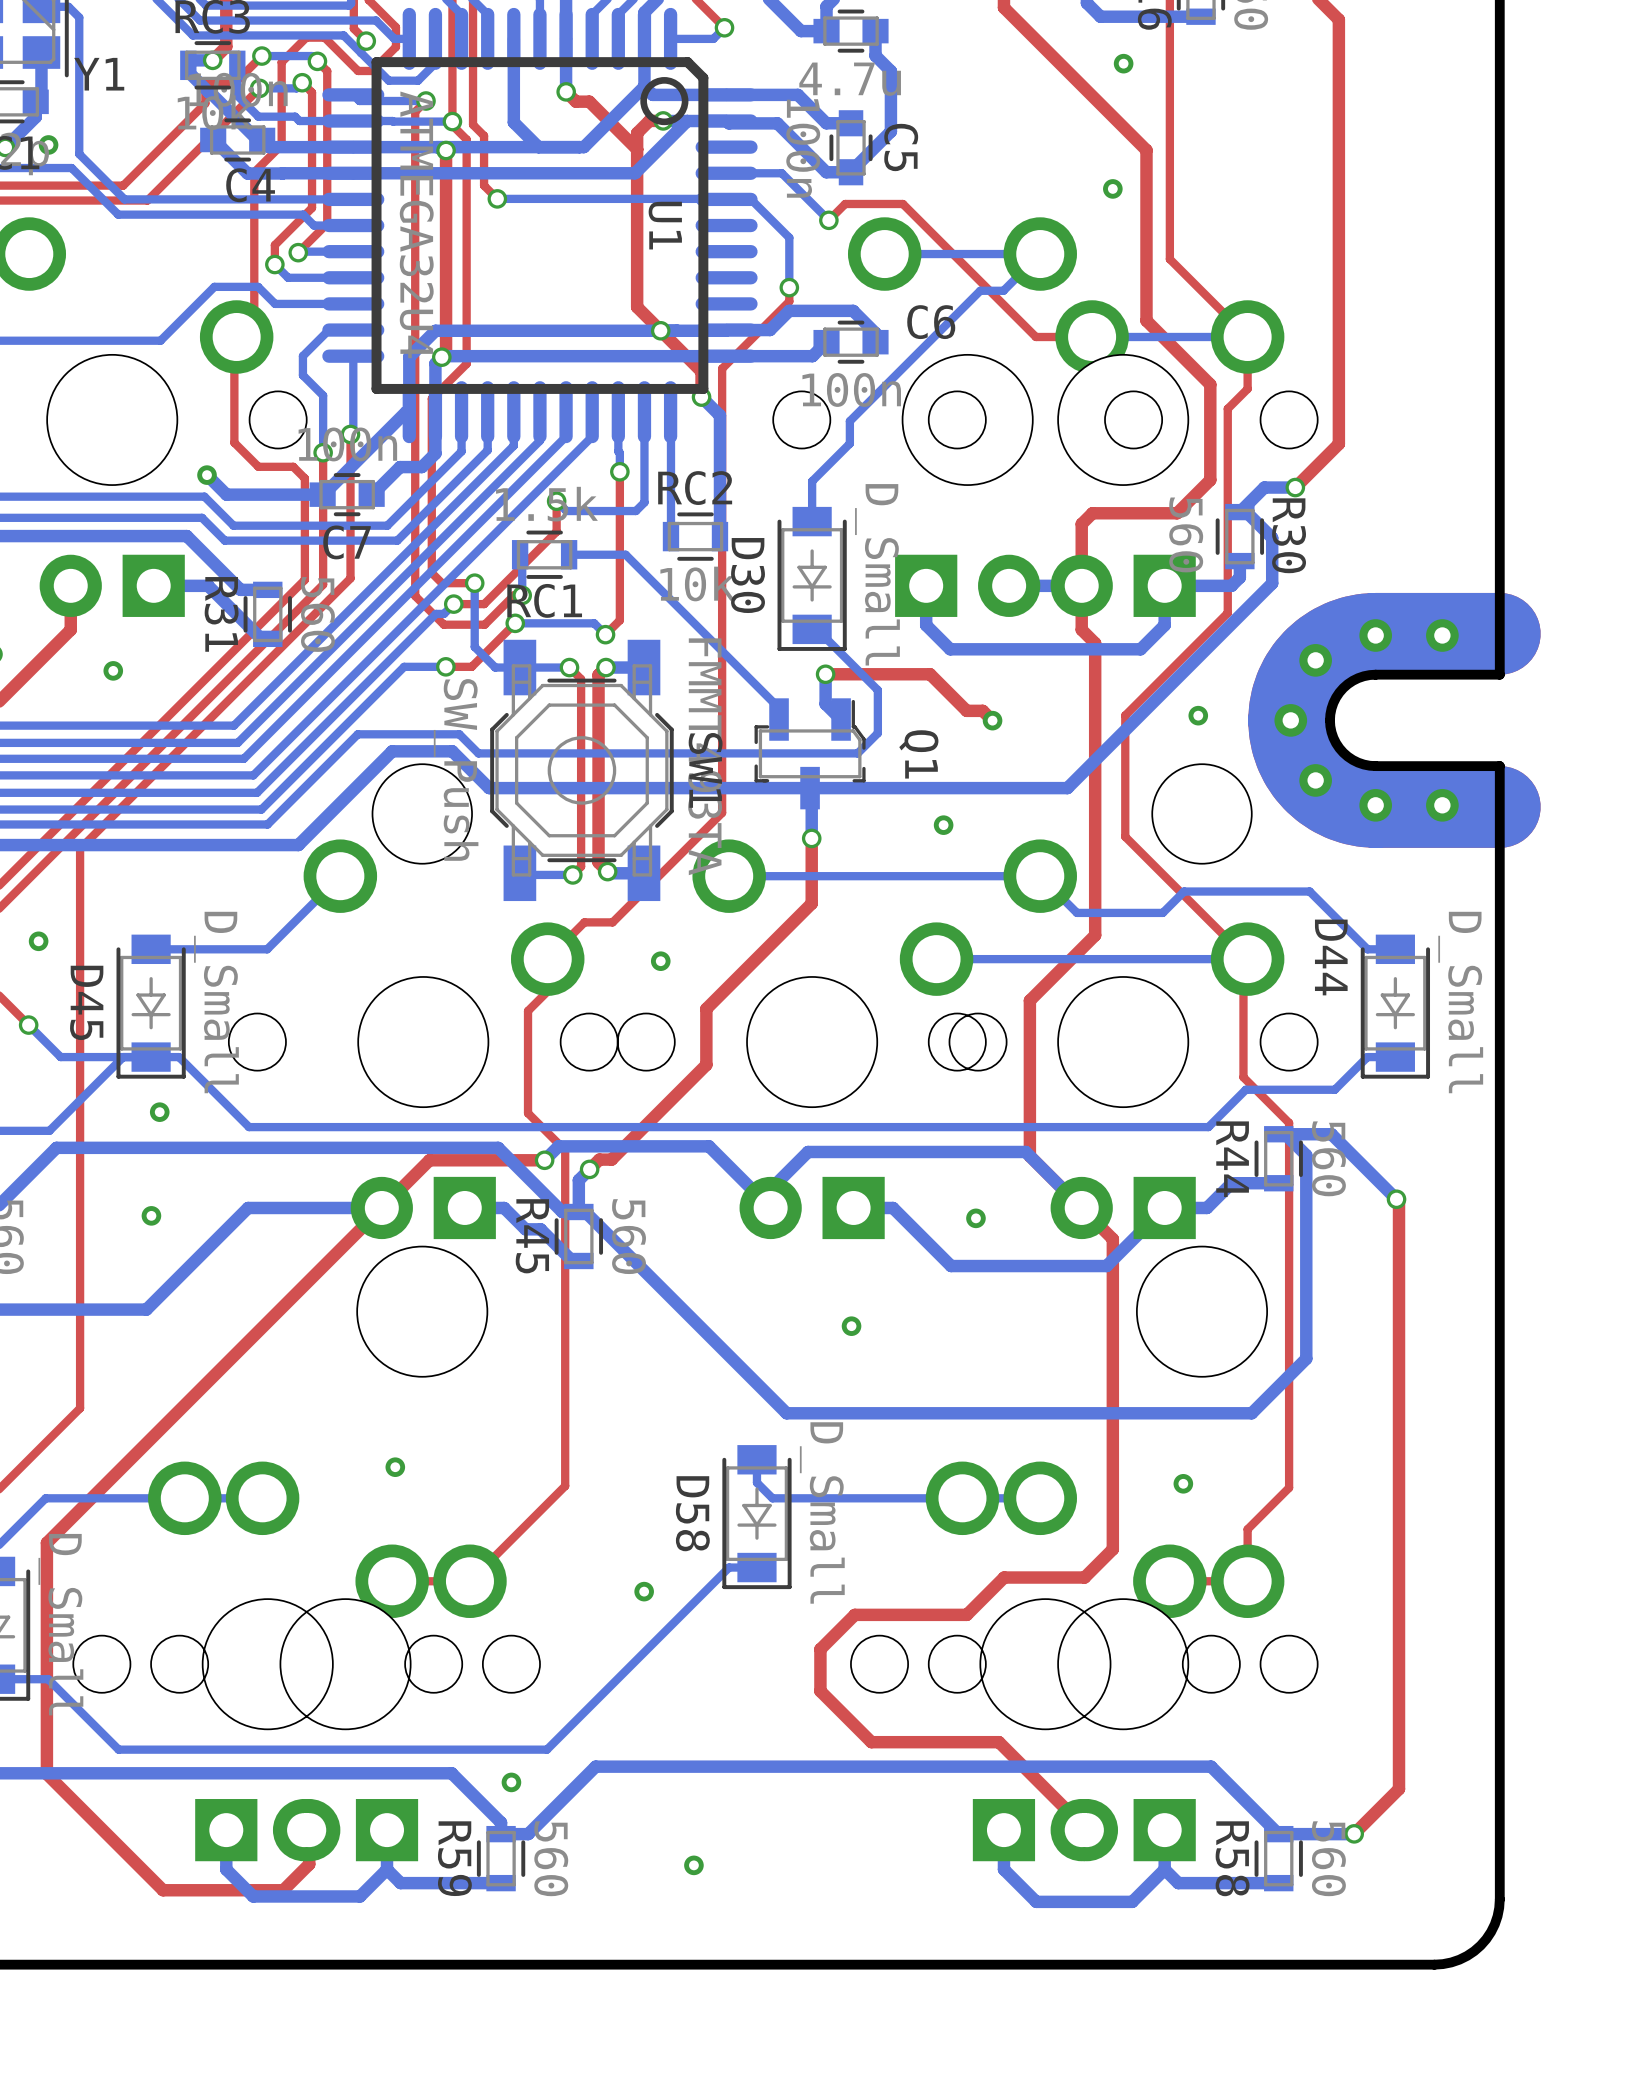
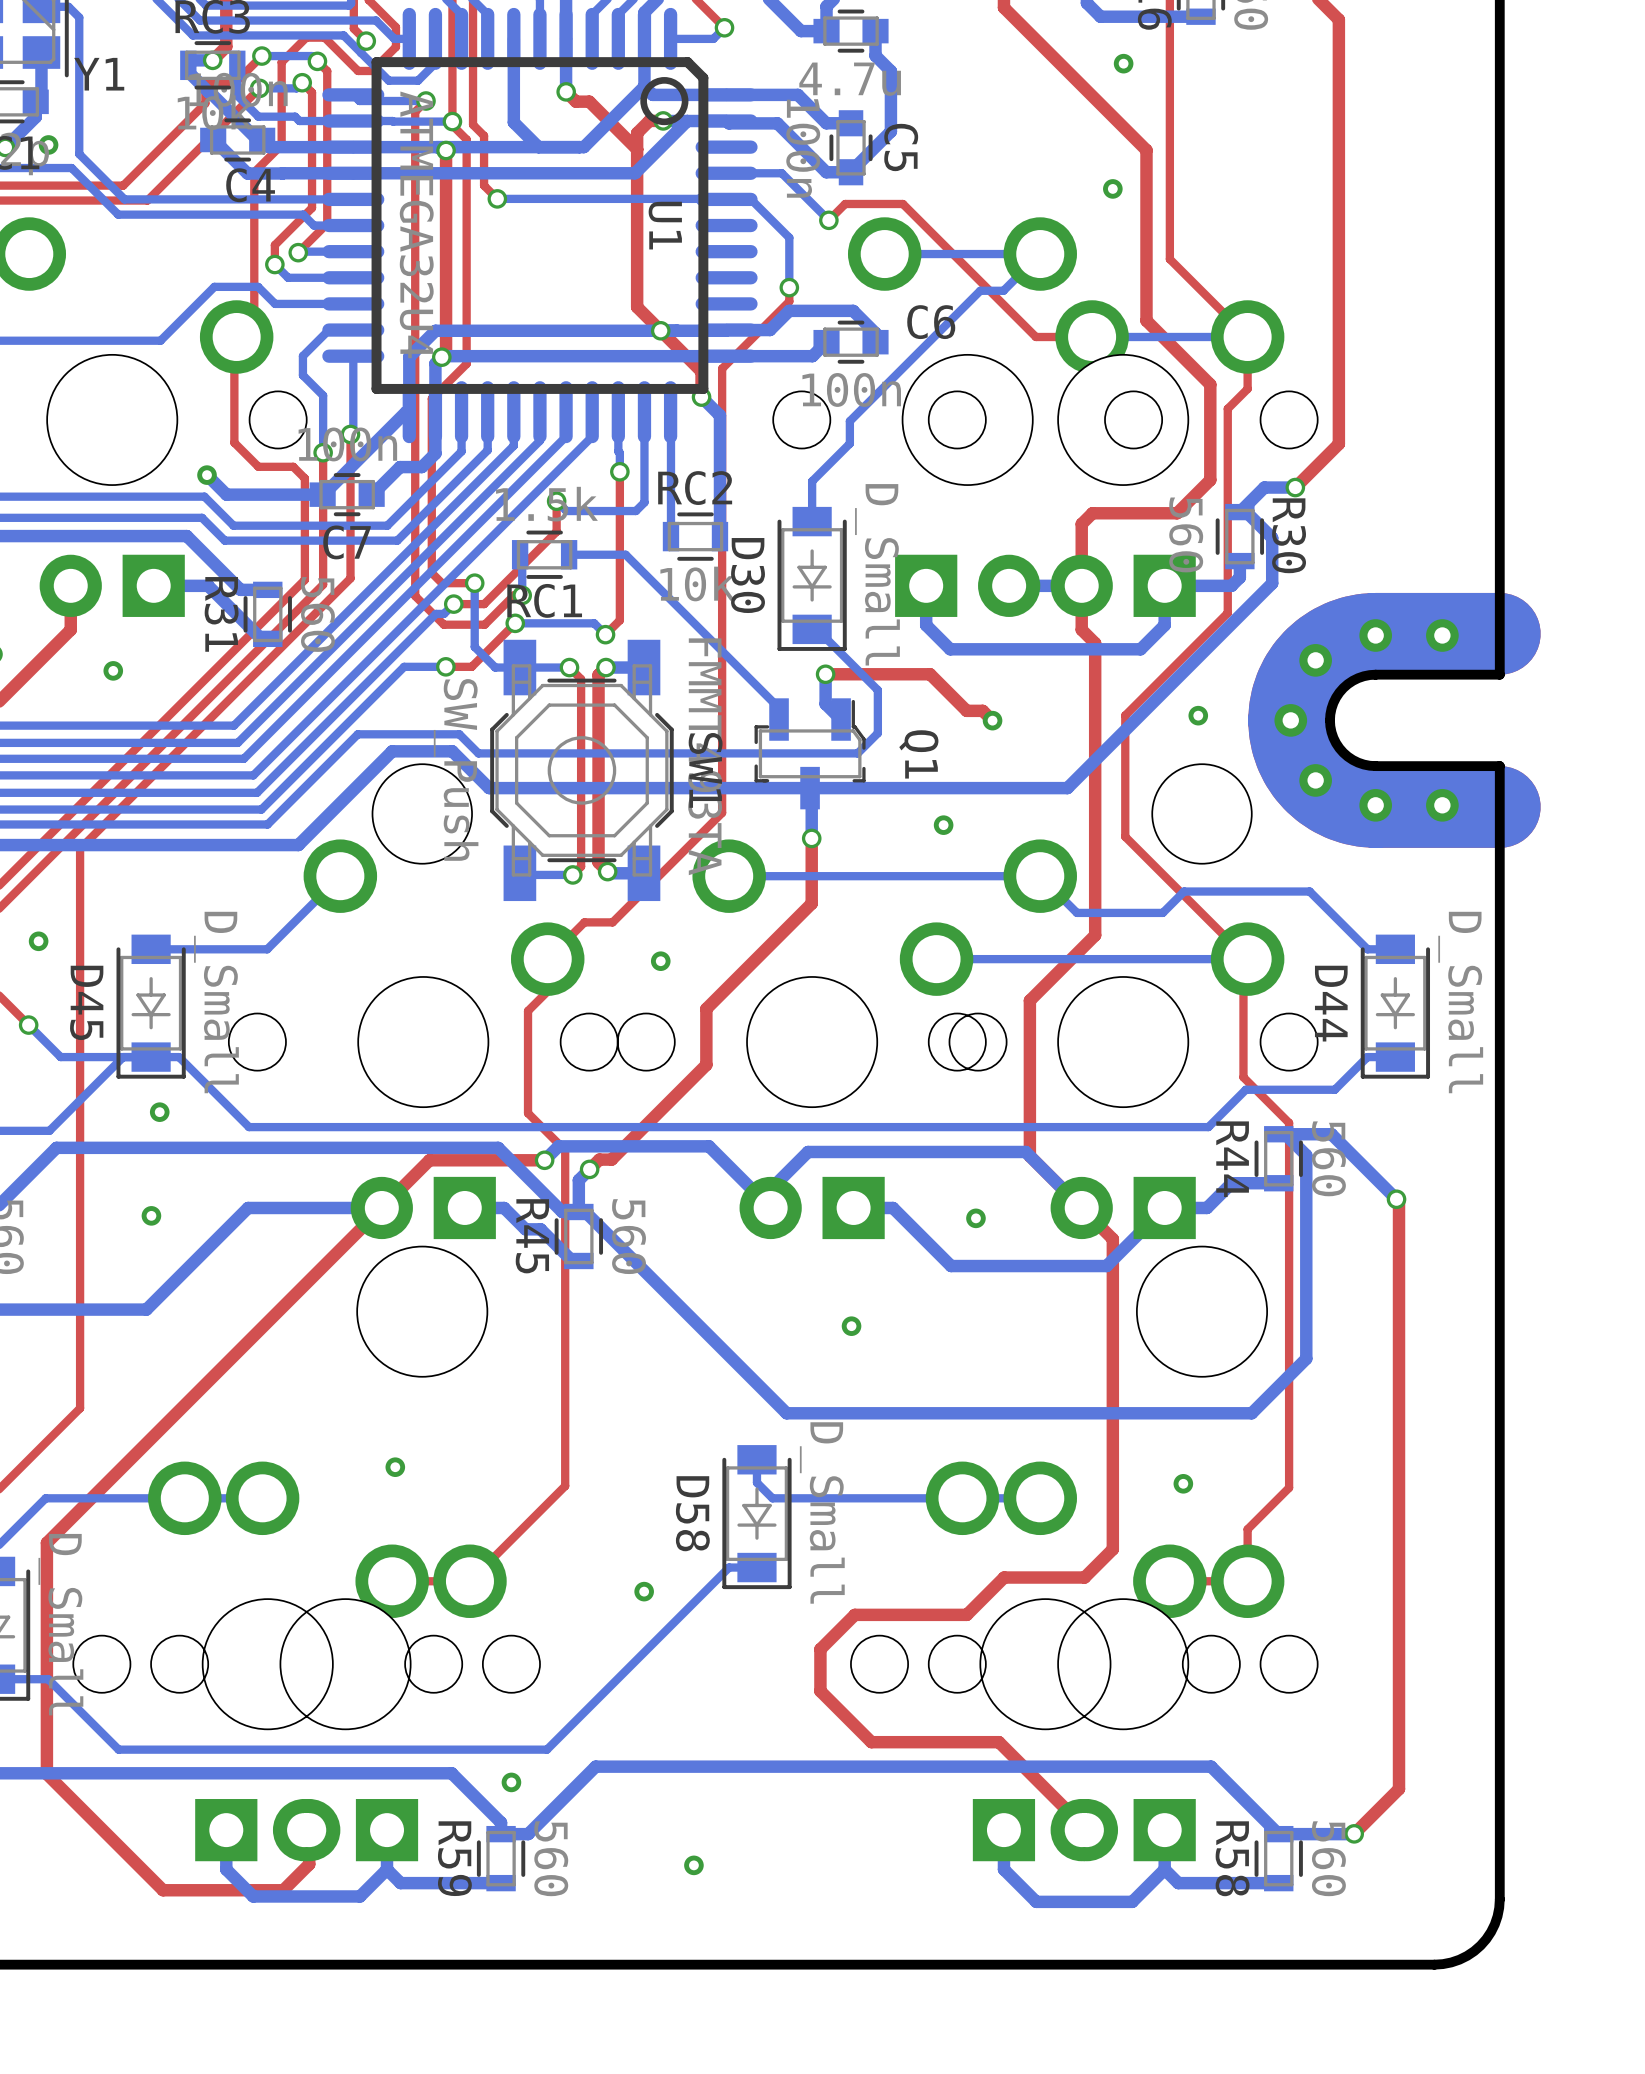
D44 name position: D44 (1331, 957) -> D44 (1331, 1003)

